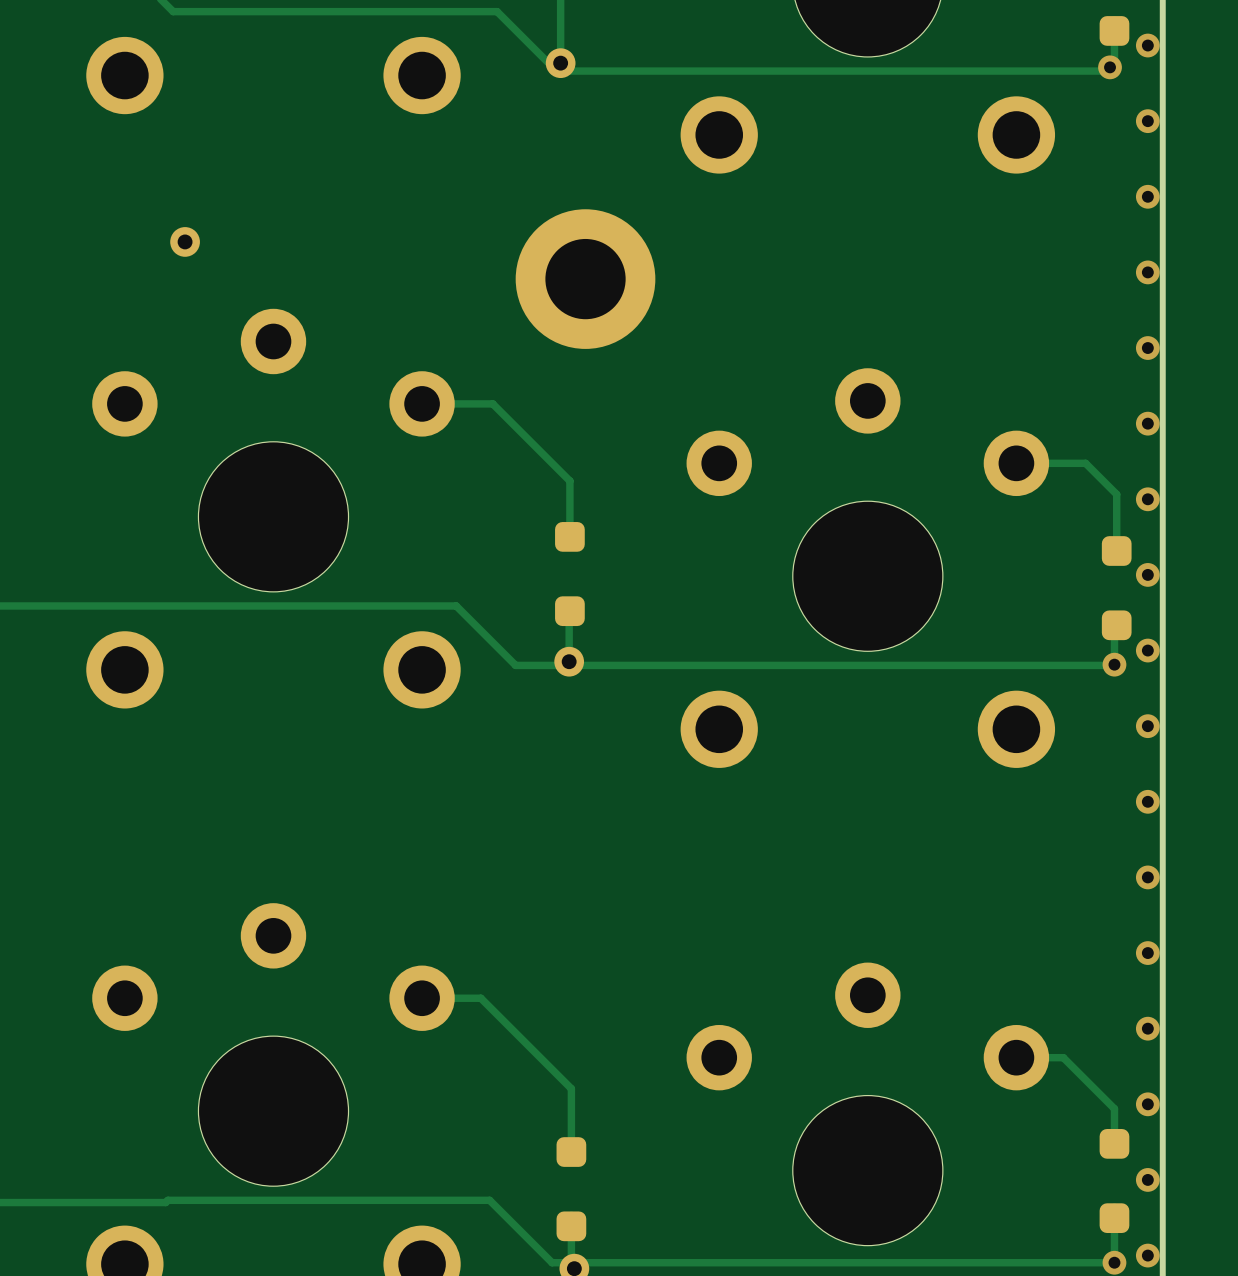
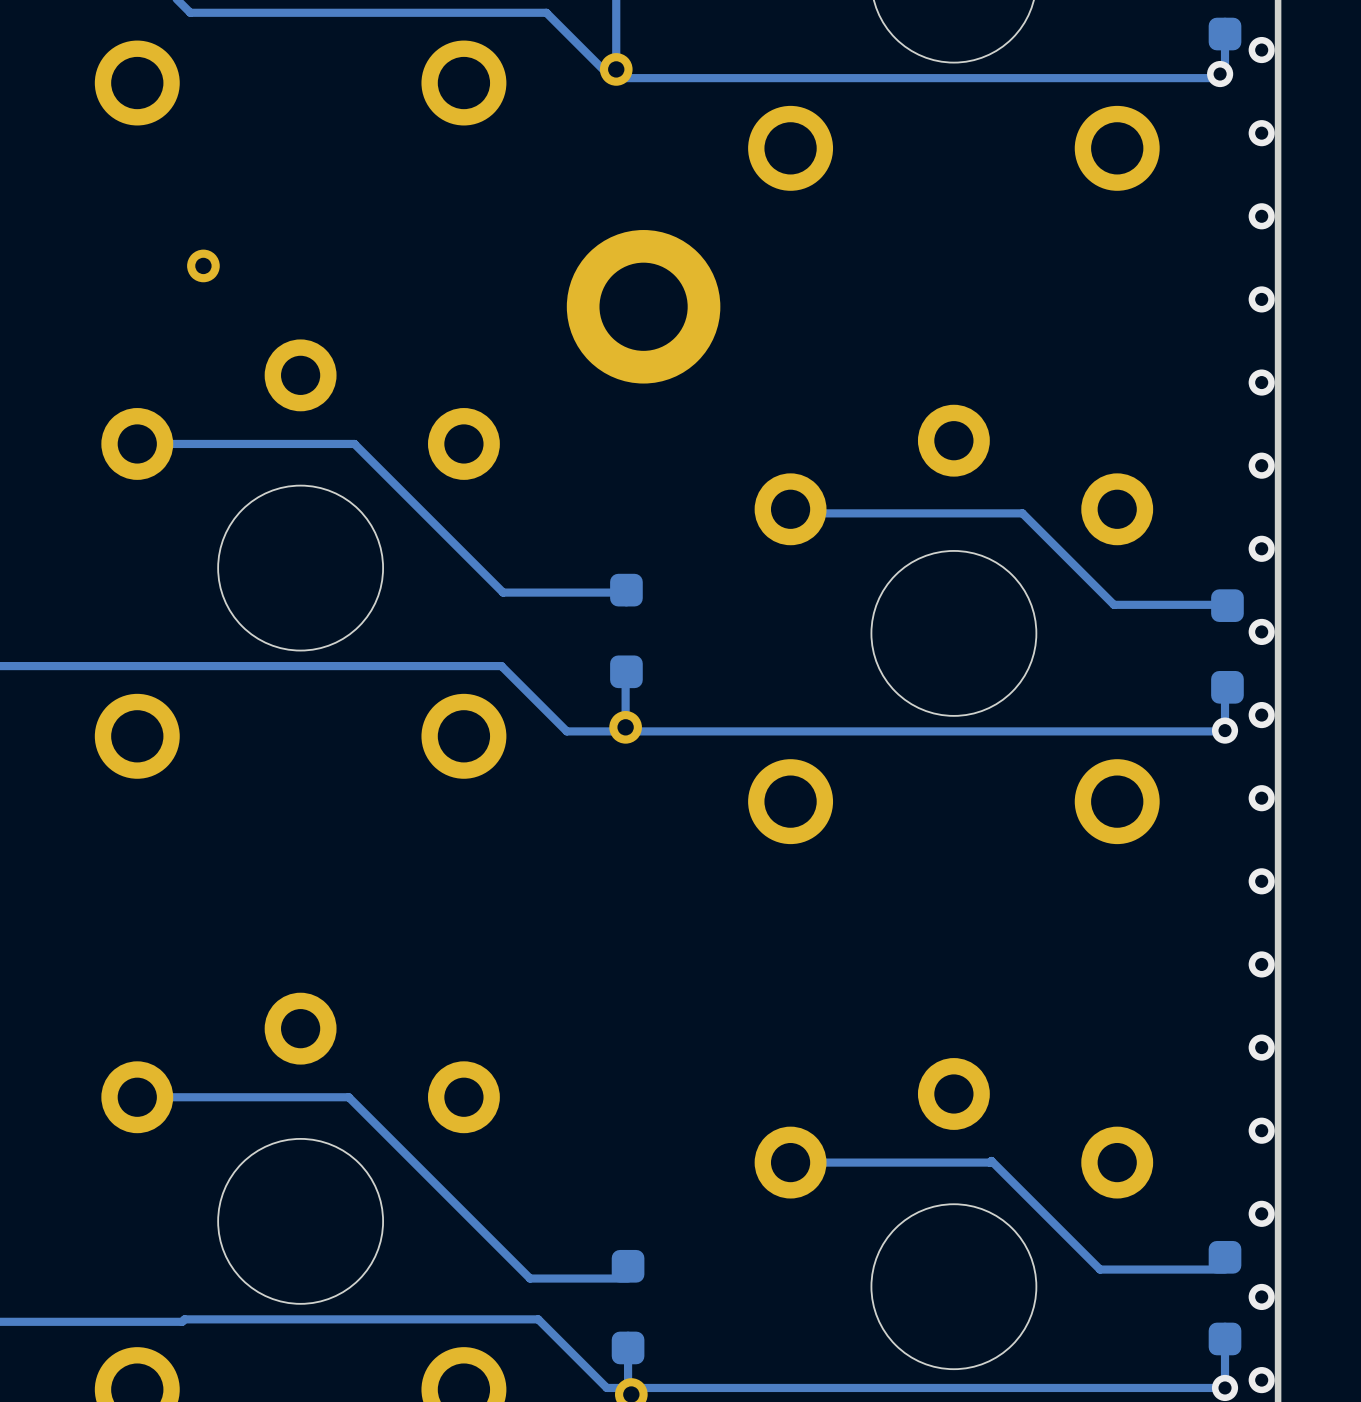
track: none -> (137, 443) (354, 443) (503, 592) (616, 592) (626, 602)
track: (422, 403) (492, 403) (569, 481) (569, 536) -> none
track: (1016, 463) (1085, 463) (1116, 494) (1116, 551) -> none
track: none -> (794, 513) (1022, 513) (1113, 604) (1214, 604) (1227, 617)
track: none -> (137, 1097) (348, 1097) (530, 1278) (628, 1278)
track: (422, 998) (480, 998) (571, 1088) (571, 1152) -> none
track: none -> (790, 1162) (989, 1162) (991, 1160) (1100, 1269) (1225, 1269)
track: (1016, 1057) (1063, 1057) (1114, 1108) (1114, 1143) -> none

